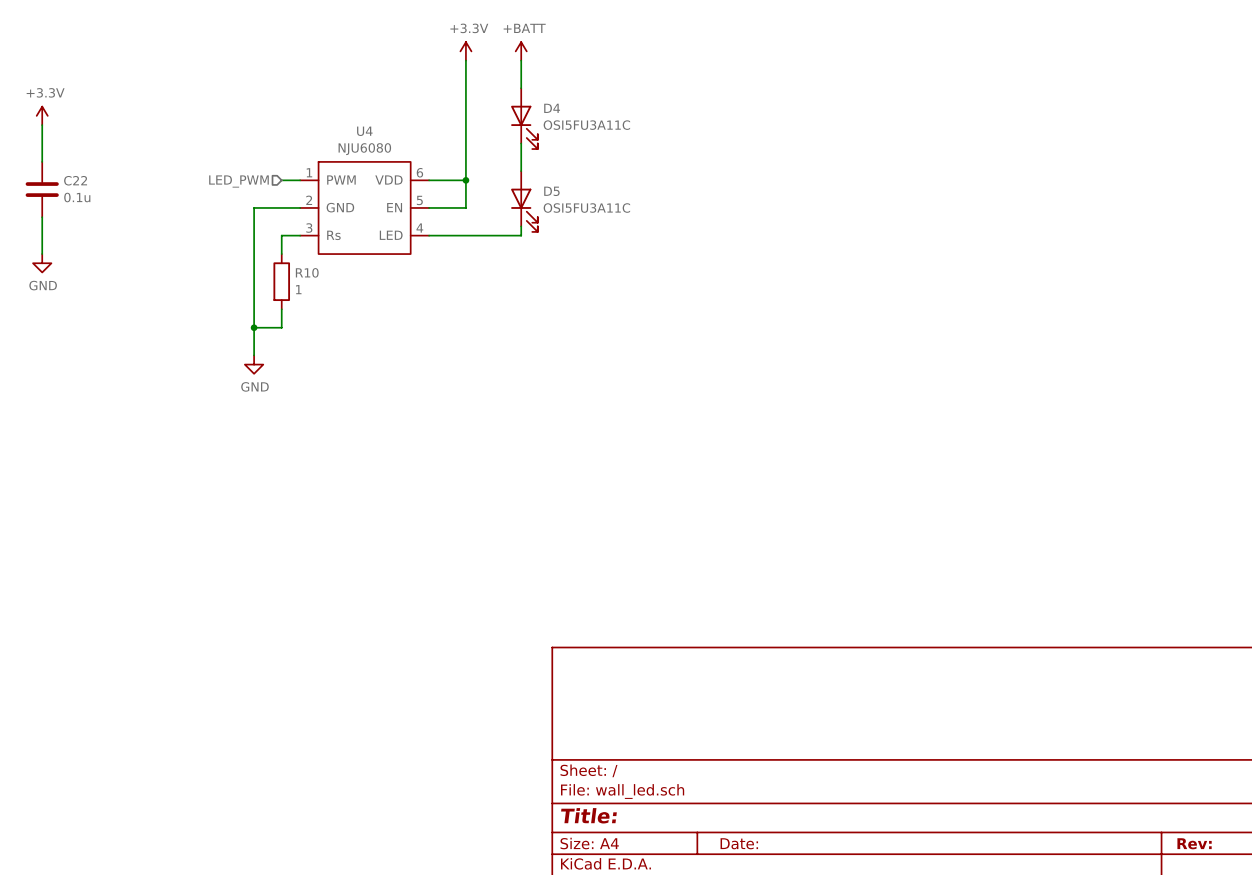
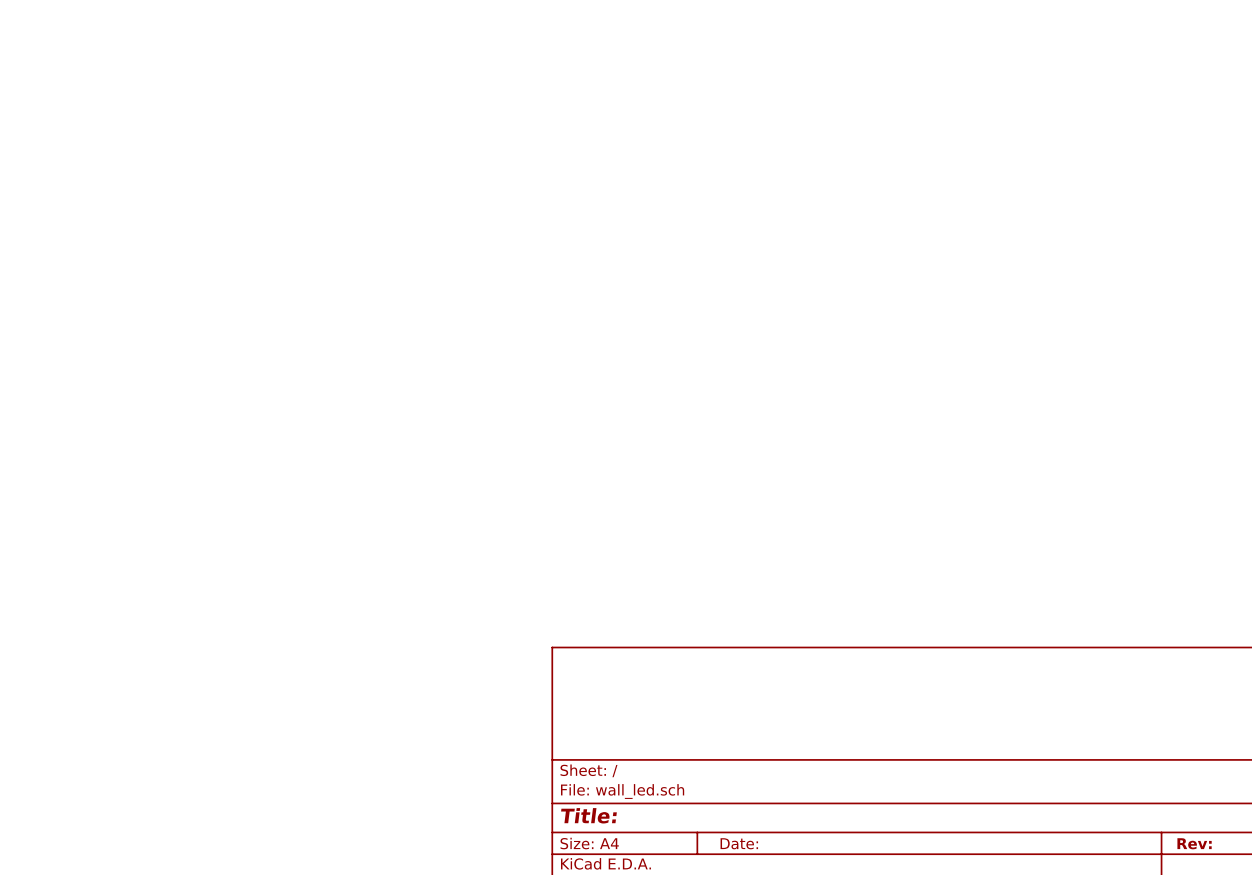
power symbol: +3.3V (465, 51) -> none
power symbol: +BATT (521, 51) -> none
wire: (465, 60) (465, 207) (429, 207) -> none
wire: (521, 60) (521, 88) -> none
power symbol: +3.3V (42, 115) -> none
D4: OSI5FU3A11C (524, 118) -> none
wire: (42, 125) (42, 161) -> none
wire: (521, 143) (521, 171) -> none
wire: (281, 180) (300, 180) -> none
wire: (429, 180) (465, 180) -> none
junction: (465, 180) -> none
hierarchical label: LED_PWM (238, 181) -> none
C22: 0.1u (42, 189) -> none
D5: OSI5FU3A11C (524, 201) -> none
wire: (300, 207) (254, 207) (254, 355) -> none
U4: NJU6080 (364, 207) -> none
wire: (42, 217) (42, 254) -> none
wire: (521, 226) (521, 235) (429, 235) -> none
wire: (300, 235) (281, 235) (281, 254) -> none
power symbol: GND (42, 263) -> none
R10: 1 (281, 281) -> none
wire: (281, 309) (281, 327) (254, 327) -> none
junction: (254, 327) -> none
power symbol: GND (254, 364) -> none

